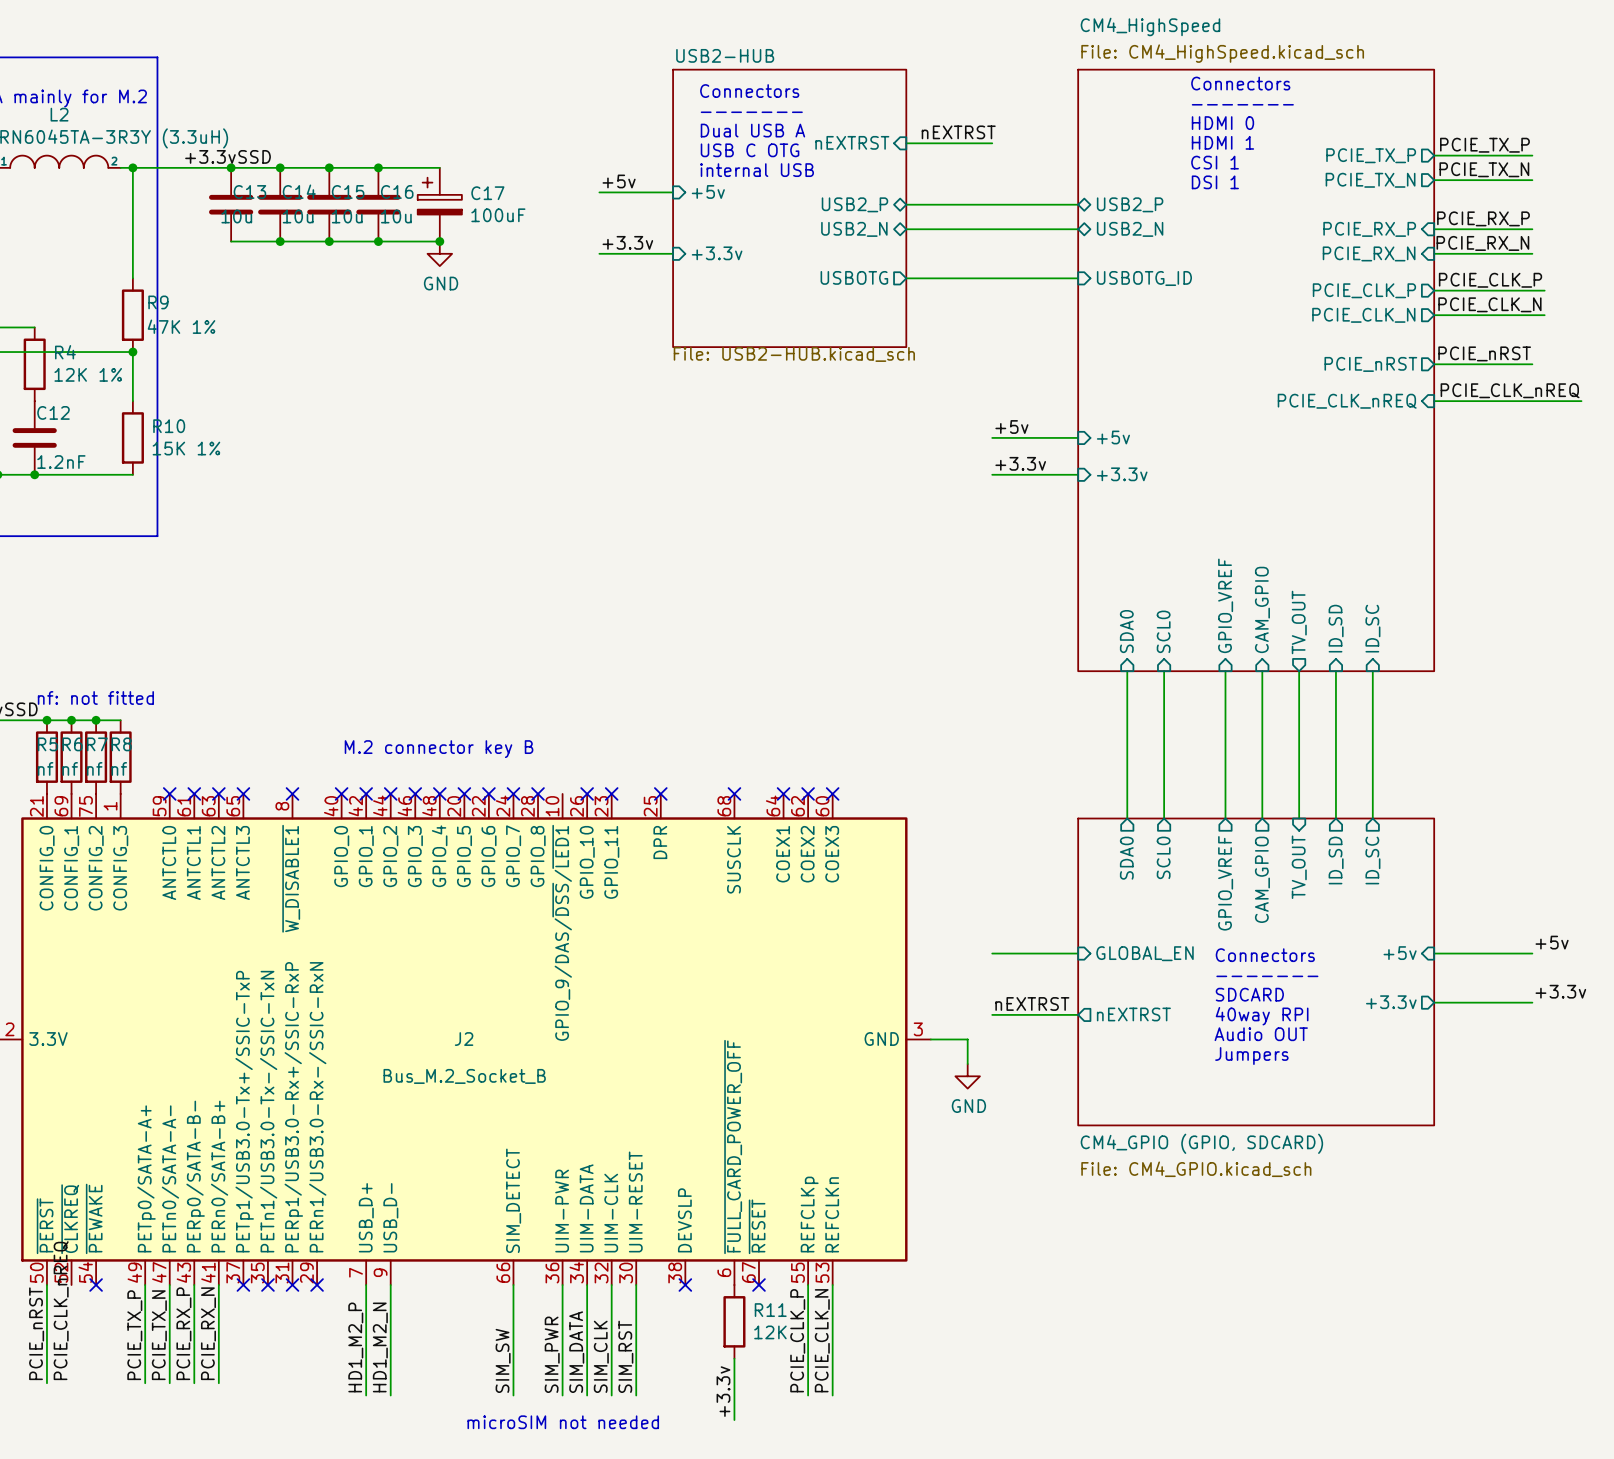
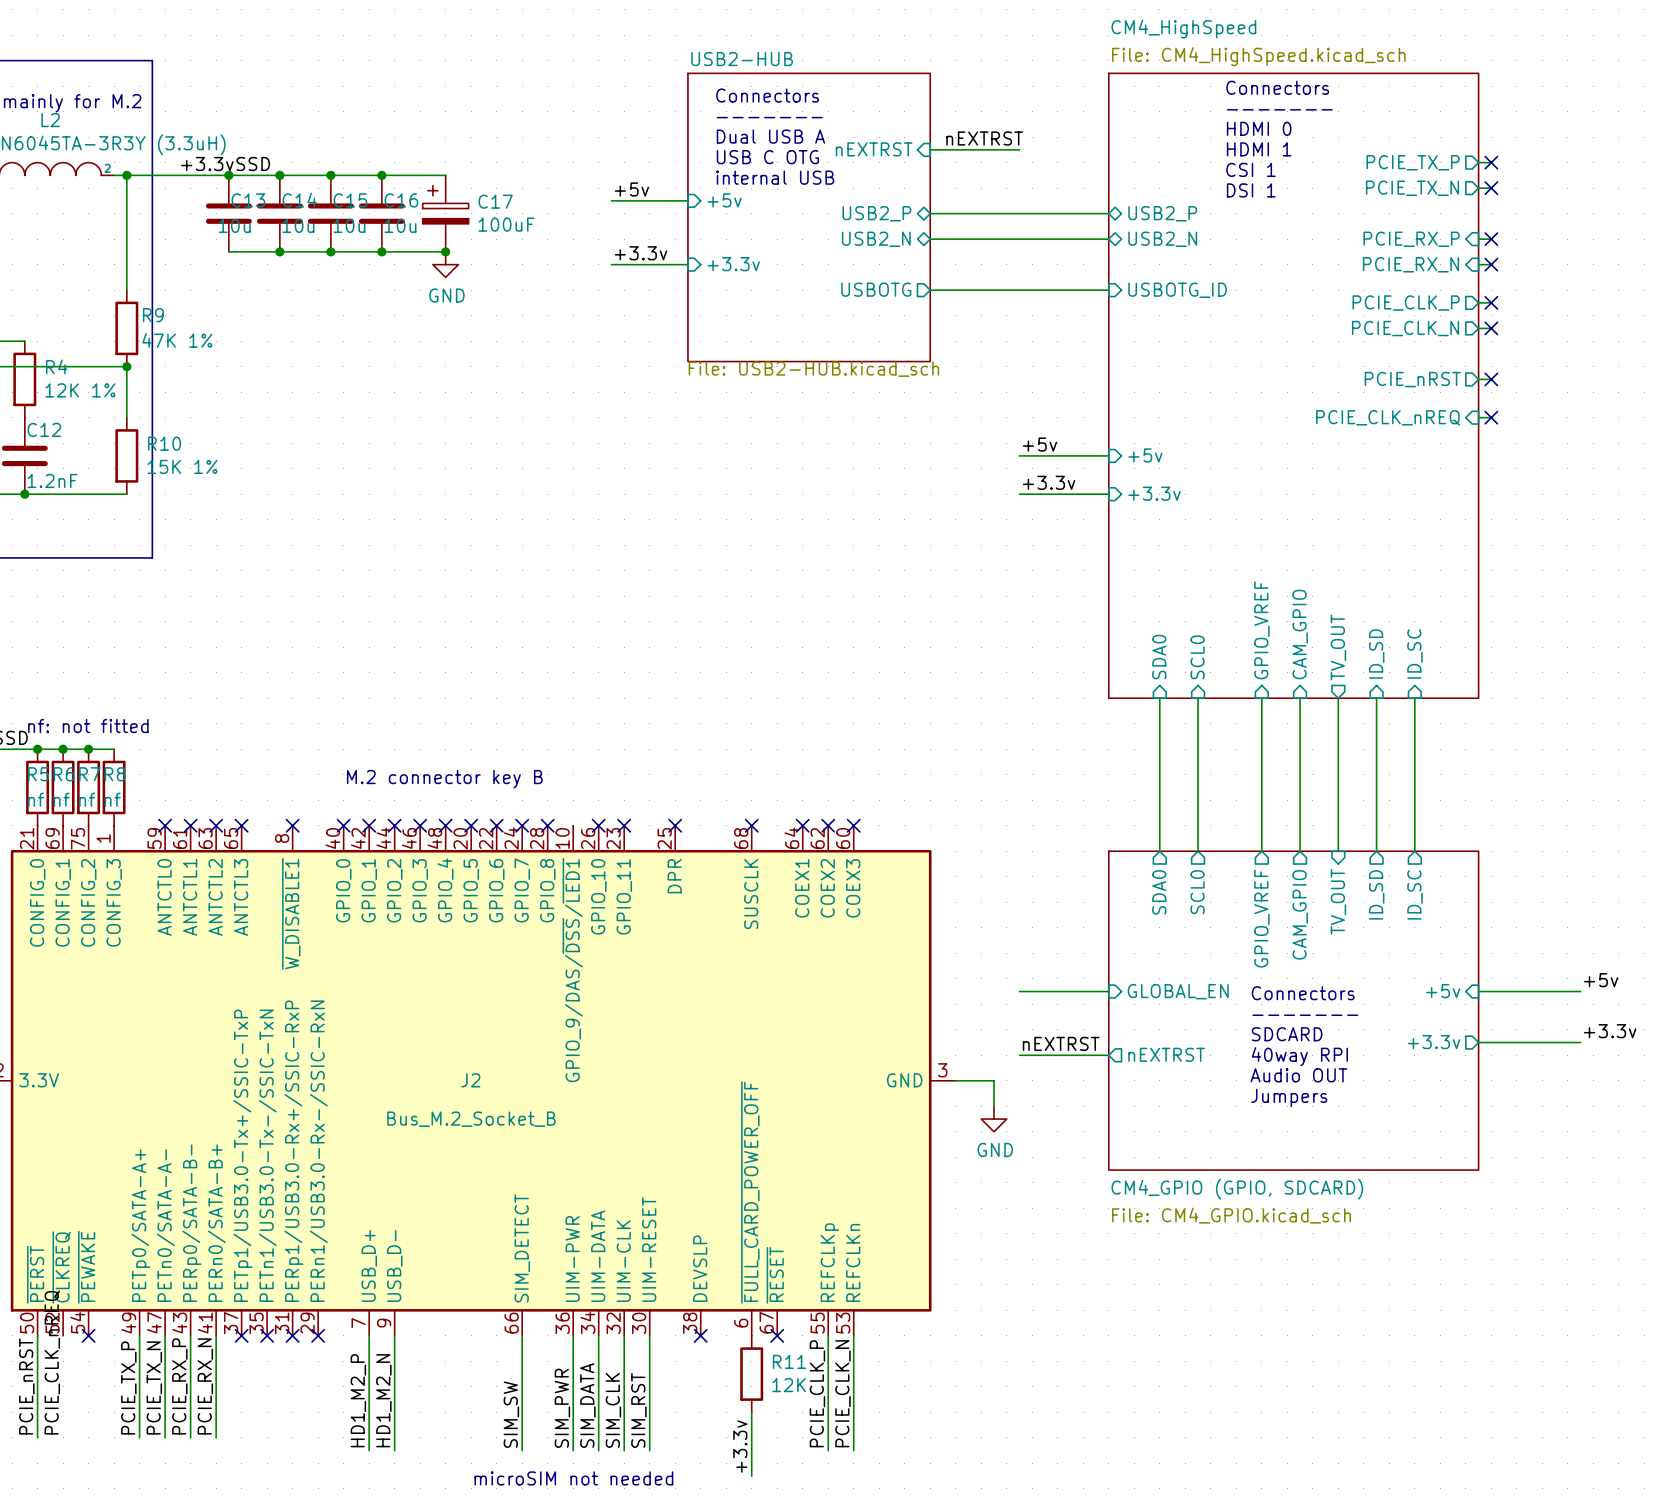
label: PCIE_TX_P (1484, 145) -> none
wire: (1446, 155) (1532, 155) -> none
no-connect mark: none -> (1491, 162)
label: PCIE_TX_N (1484, 169) -> none
wire: (1446, 180) (1532, 180) -> none
no-connect mark: none -> (1491, 188)
label: PCIE_RX_P (1483, 218) -> none
wire: (1446, 229) (1532, 229) -> none
no-connect mark: none -> (1491, 239)
label: PCIE_RX_N (1482, 243) -> none
wire: (1446, 253) (1532, 253) -> none
no-connect mark: none -> (1491, 264)
label: PCIE_CLK_P (1490, 280) -> none
wire: (1446, 290) (1544, 290) -> none
no-connect mark: none -> (1491, 302)
label: PCIE_CLK_N (1489, 304) -> none
wire: (1446, 315) (1544, 315) -> none
no-connect mark: none -> (1491, 328)
label: PCIE_nRST (1484, 353) -> none
wire: (1446, 364) (1532, 364) -> none
no-connect mark: none -> (1491, 379)
label: PCIE_CLK_nREQ (1510, 390) -> none
wire: (1446, 401) (1581, 401) -> none
no-connect mark: none -> (1491, 417)

